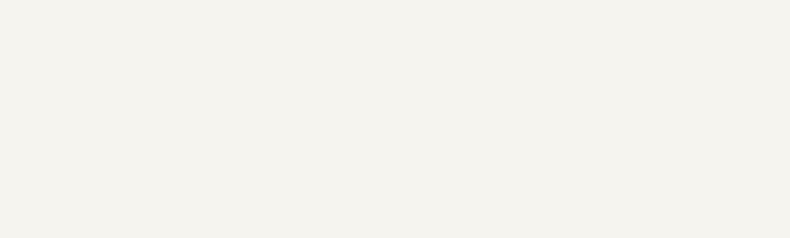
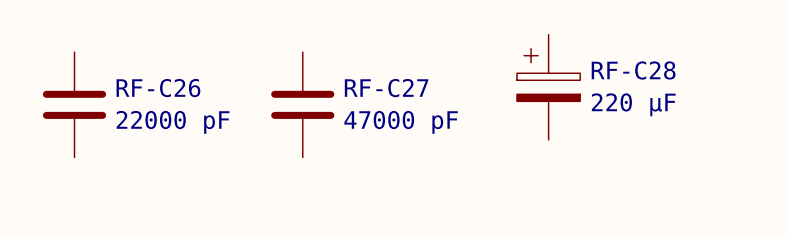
RF-C28: none -> 220 μF (548, 87)
RF-C26: none -> 22000 pF (74, 104)
RF-C27: none -> 47000 pF (302, 104)

